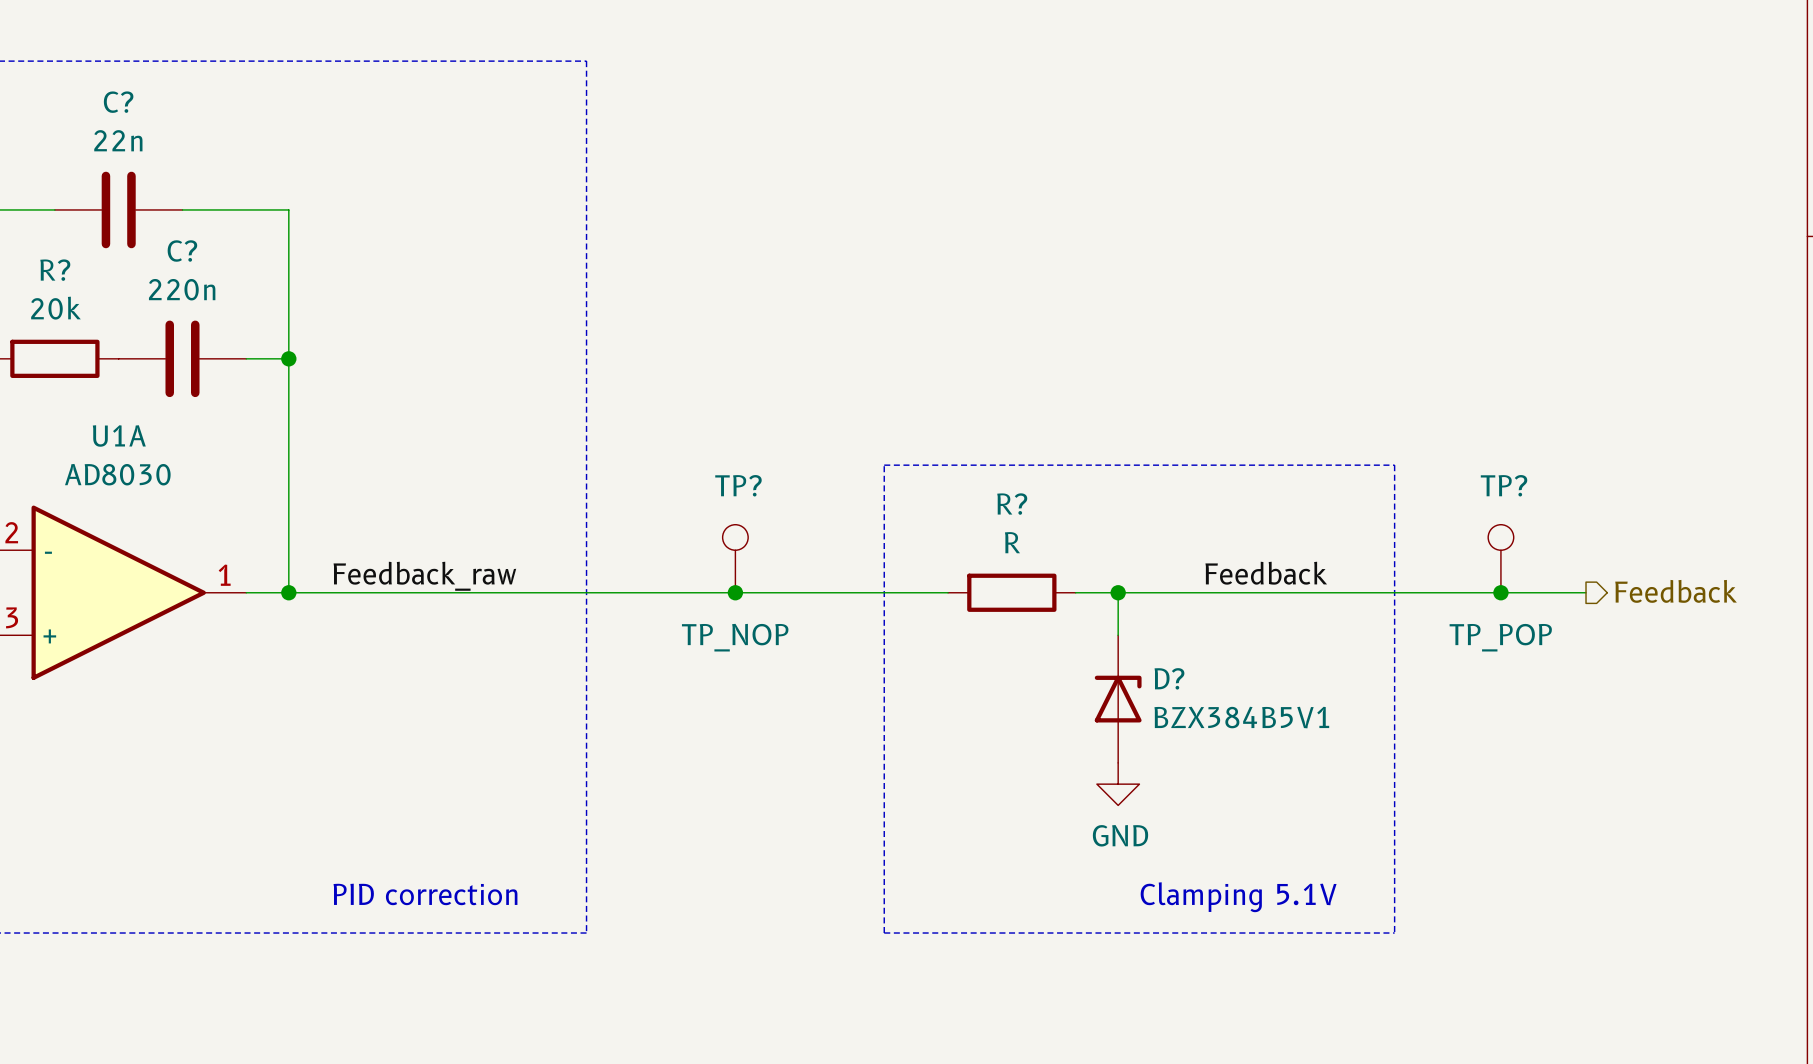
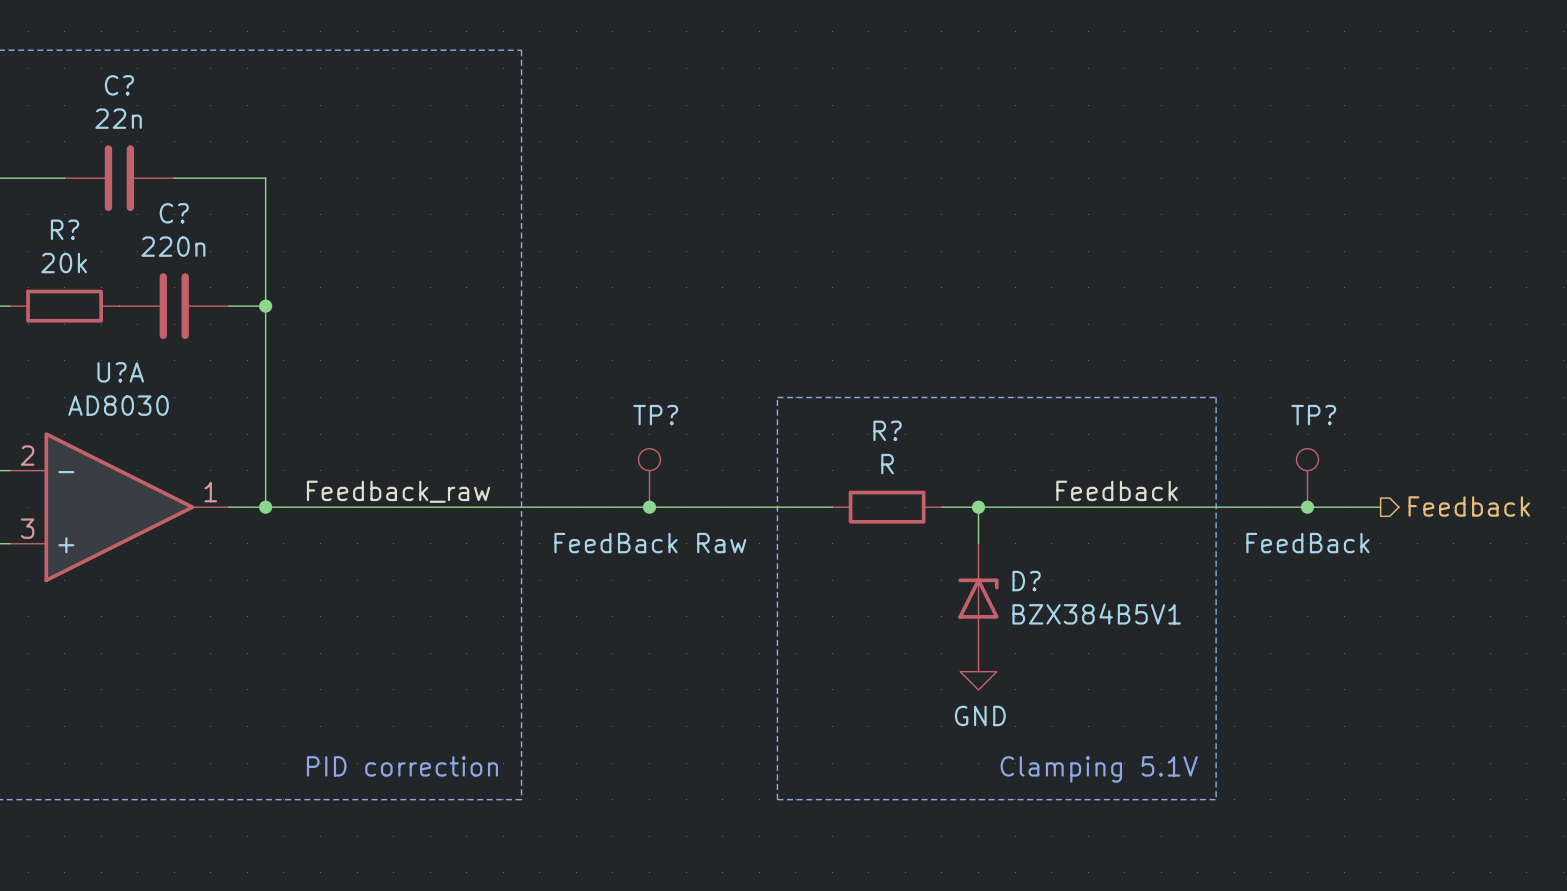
U1A name: U1A (119, 435) -> U?A (120, 372)
TP? value: TP_NOP (735, 637) -> FeedBack Raw (650, 543)
TP? value: TP_POP (1500, 637) -> FeedBack (1307, 543)

